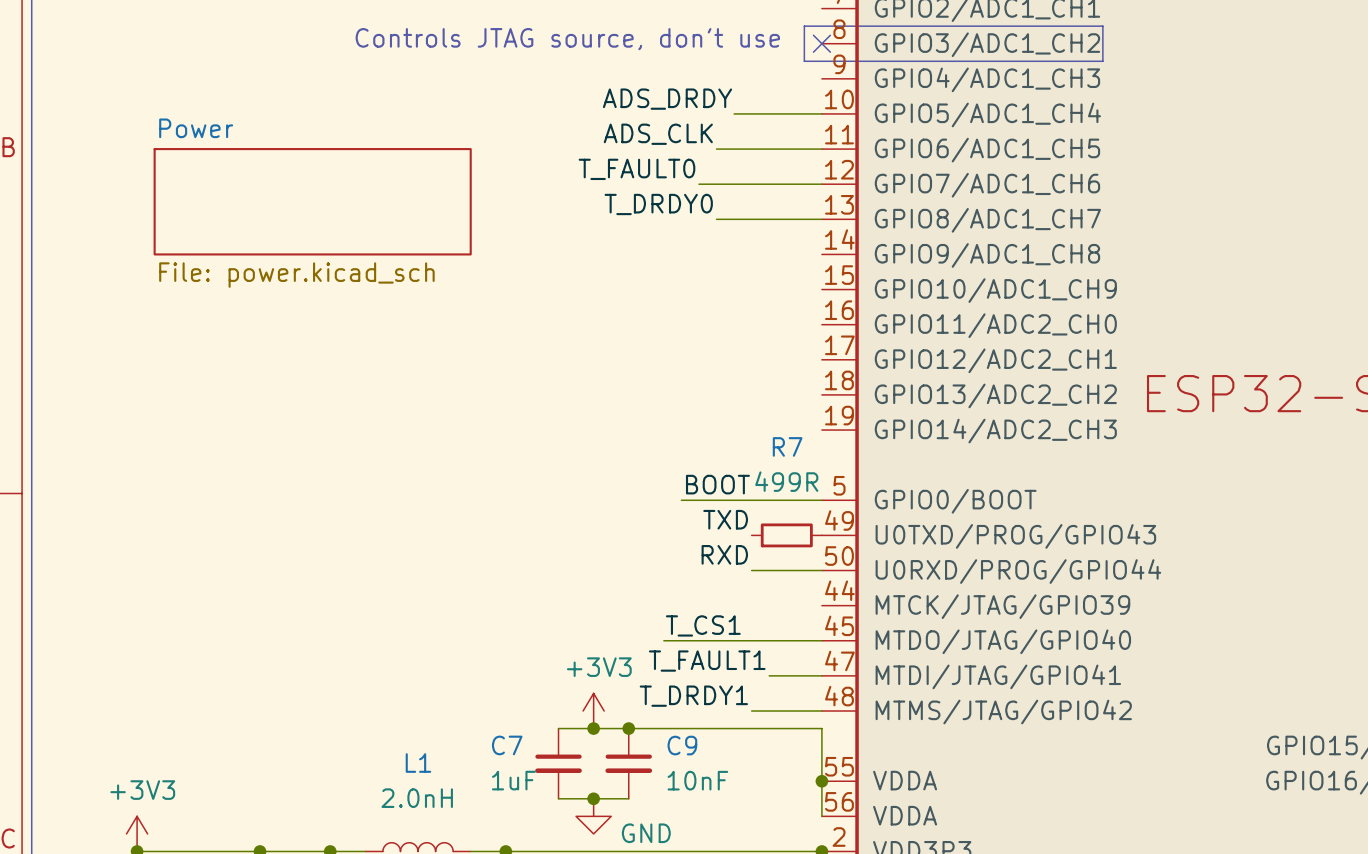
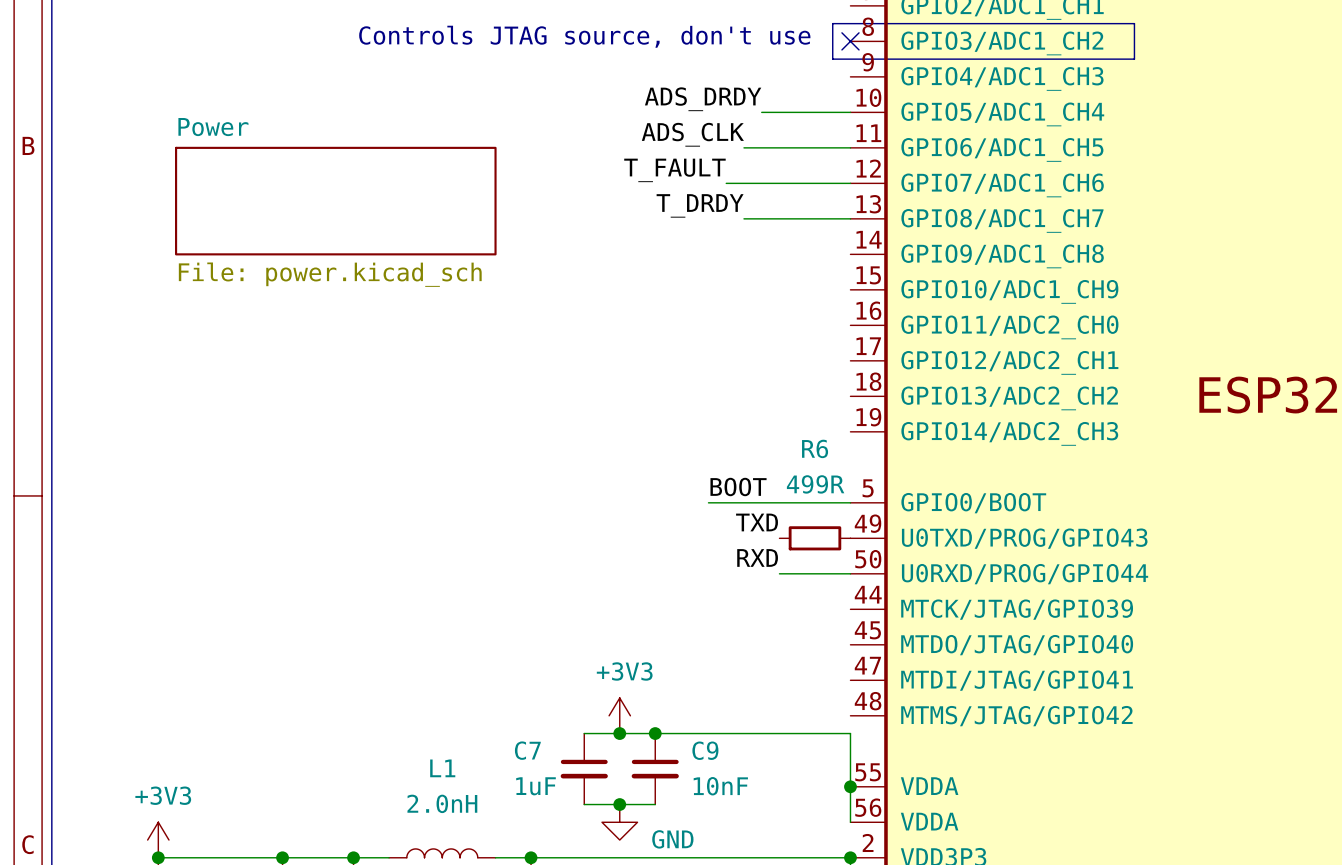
label: T_FAULT0 (636, 169) -> T_FAULT (674, 170)
label: T_DRDY0 (658, 204) -> T_DRDY (700, 205)
R7 name: R7 (787, 446) -> R6 (815, 448)
label: T_CS1 (703, 625) -> none
wire: (663, 640) (821, 640) -> none
label: T_FAULT1 (707, 661) -> none
wire: (769, 675) (821, 675) -> none
label: T_DRDY1 (693, 696) -> none
wire: (751, 711) (821, 711) -> none

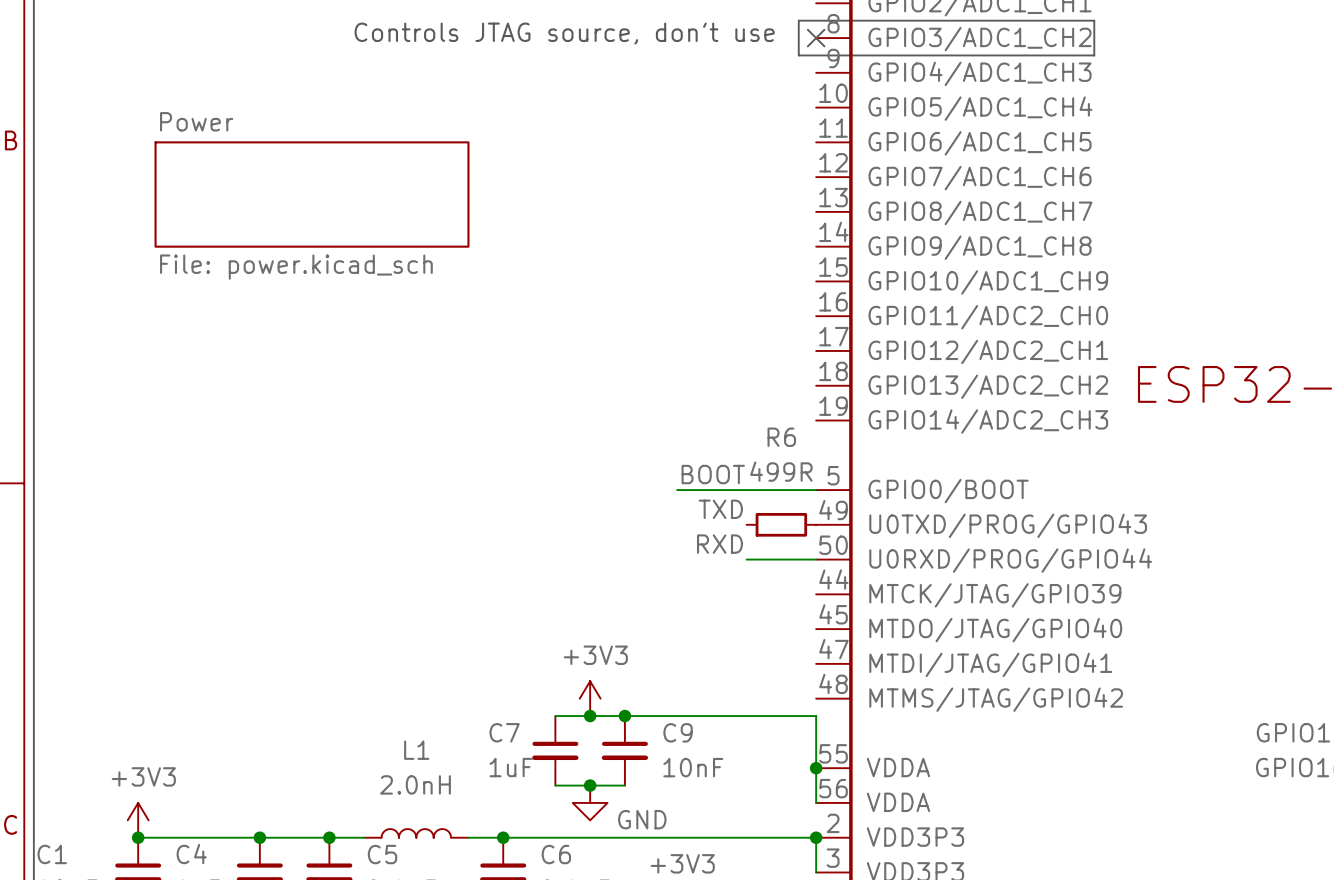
label: ADS_DRDY (703, 99) -> none
wire: (761, 112) (850, 112) -> none
label: ADS_CLK (692, 134) -> none
wire: (743, 147) (850, 147) -> none
label: T_FAULT (674, 170) -> none
wire: (726, 183) (850, 183) -> none
label: T_DRDY (700, 205) -> none
wire: (743, 218) (850, 218) -> none

